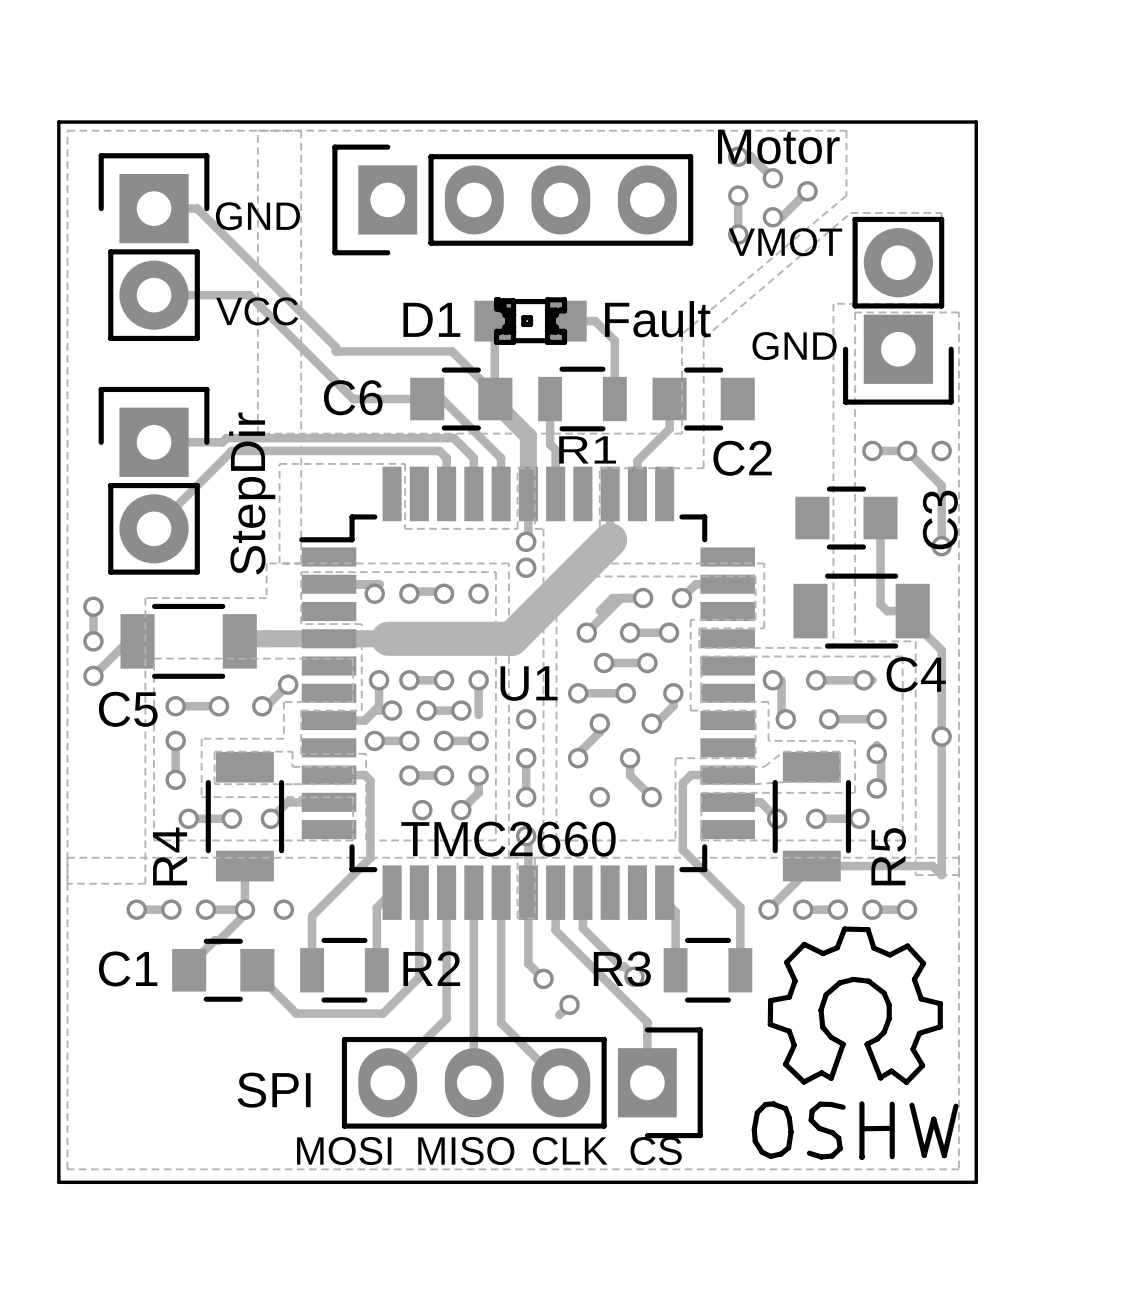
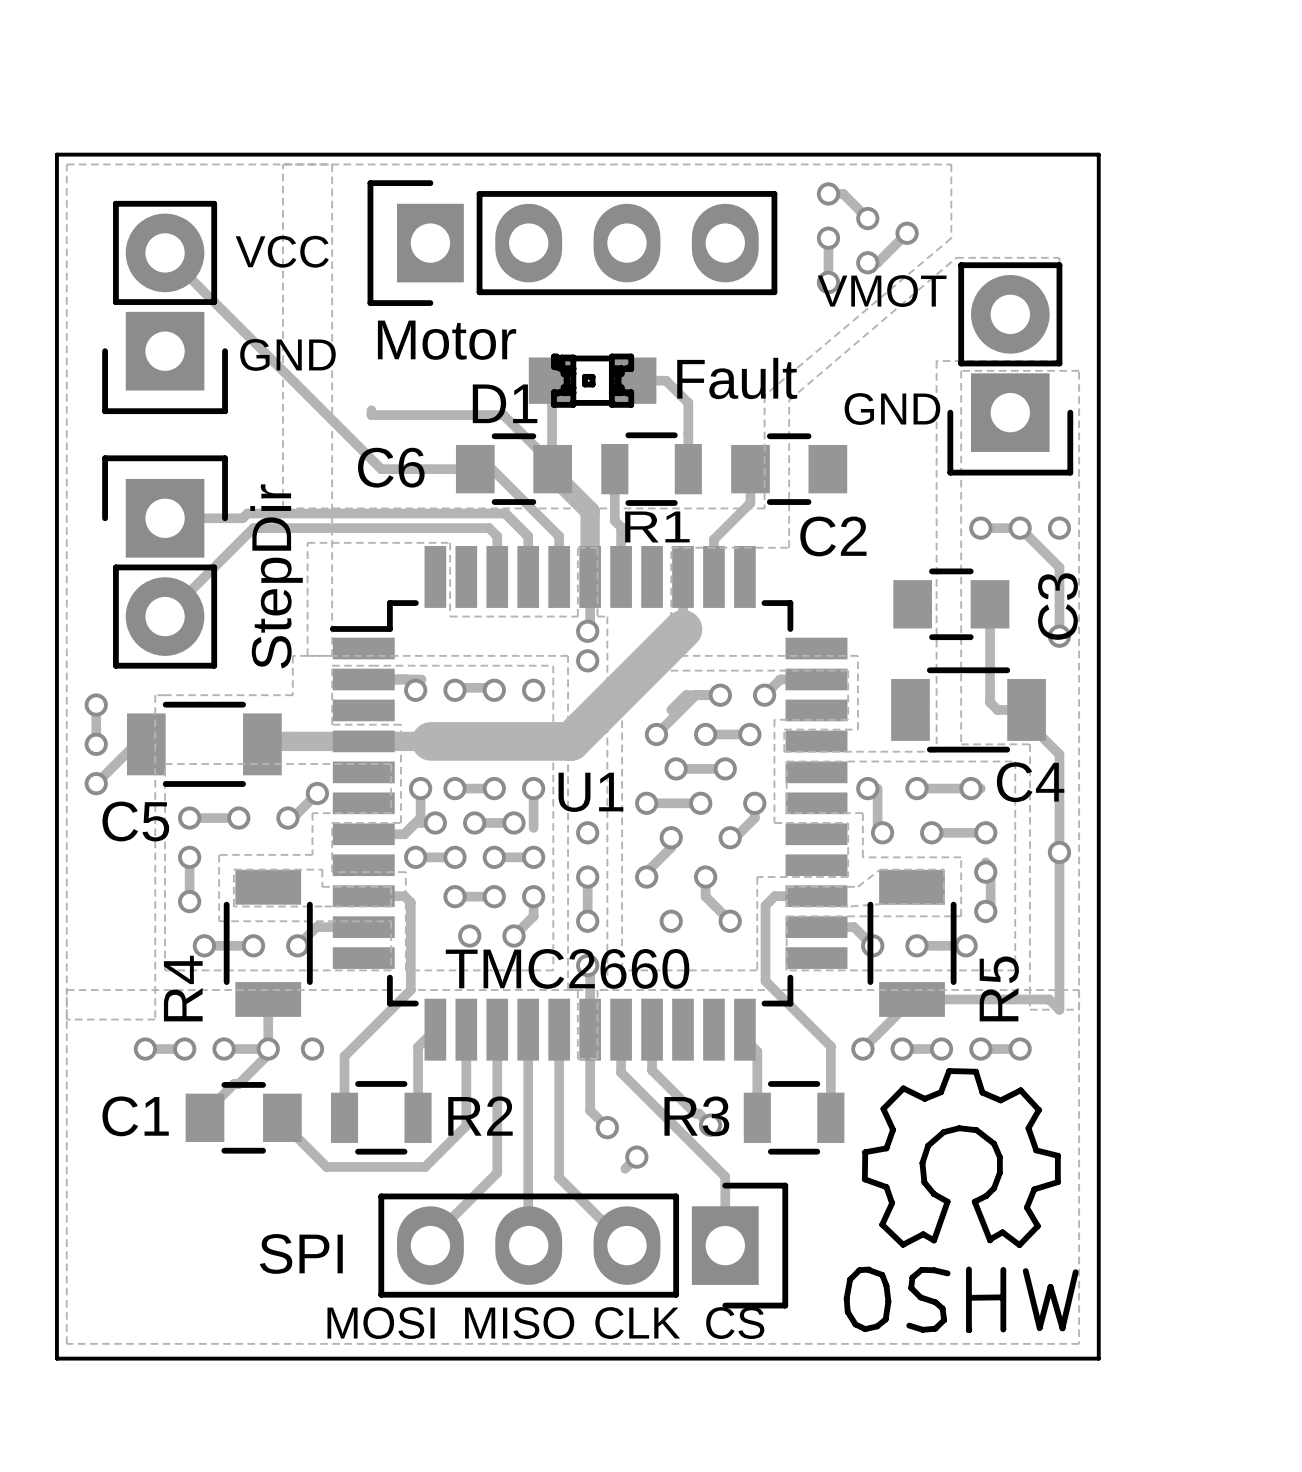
part value position: Motor (778, 146) -> Motor (447, 340)
track: (154, 208) (197, 208) (335, 347) -> (165, 252) (381, 469) (391, 469)
text position: GND (257, 216) -> GND (287, 354)
part rotation: 0° (154, 247) -> 180° (165, 307)
track: (154, 295) (249, 295) (353, 399) -> none
part value position: VCC (257, 311) -> VCC (282, 251)
D1 name position: D1 (431, 319) -> D1 (505, 403)

